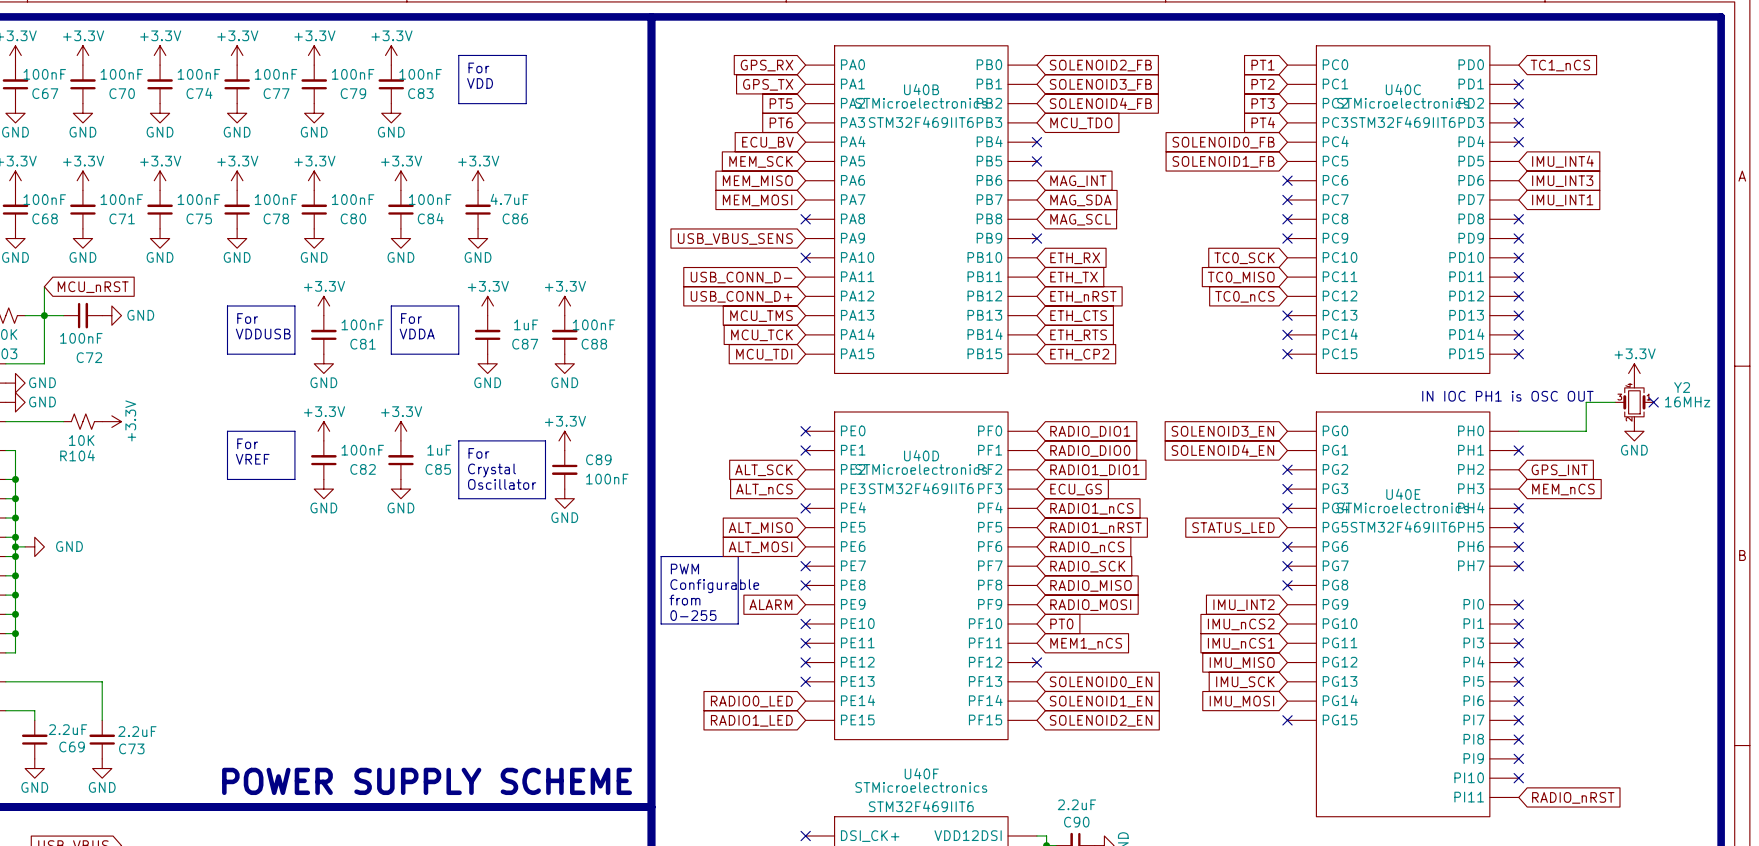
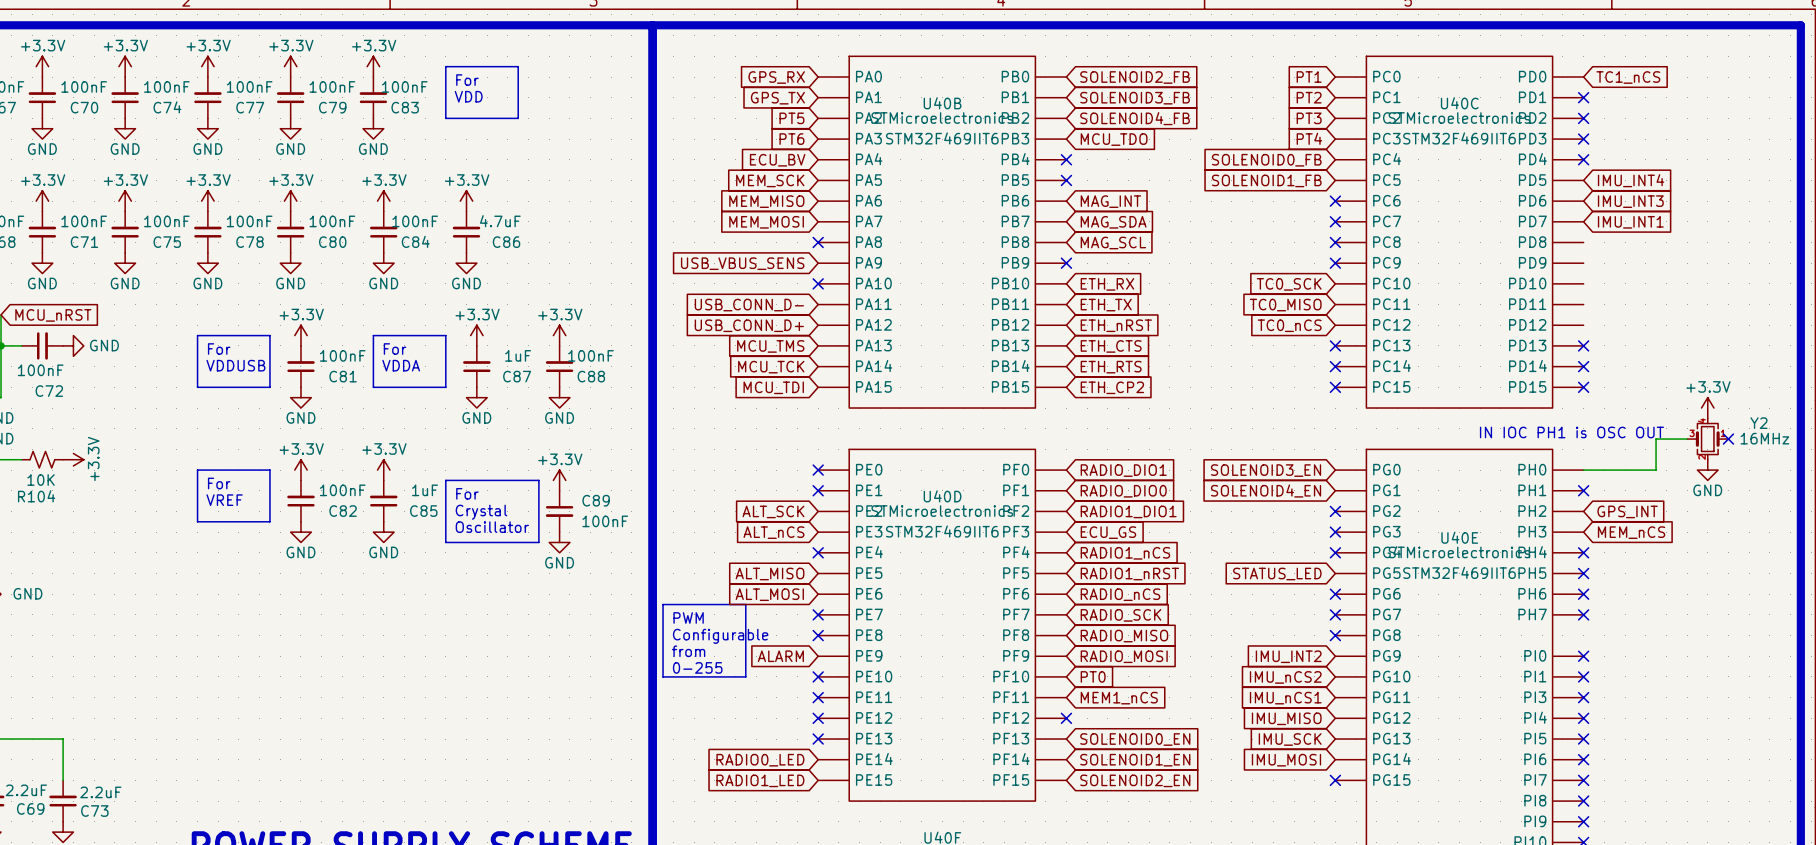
no-connect mark: (1518, 219) -> none
no-connect mark: (1518, 238) -> none
no-connect mark: (1518, 257) -> none
no-connect mark: (1518, 277) -> none
no-connect mark: (1518, 296) -> none

